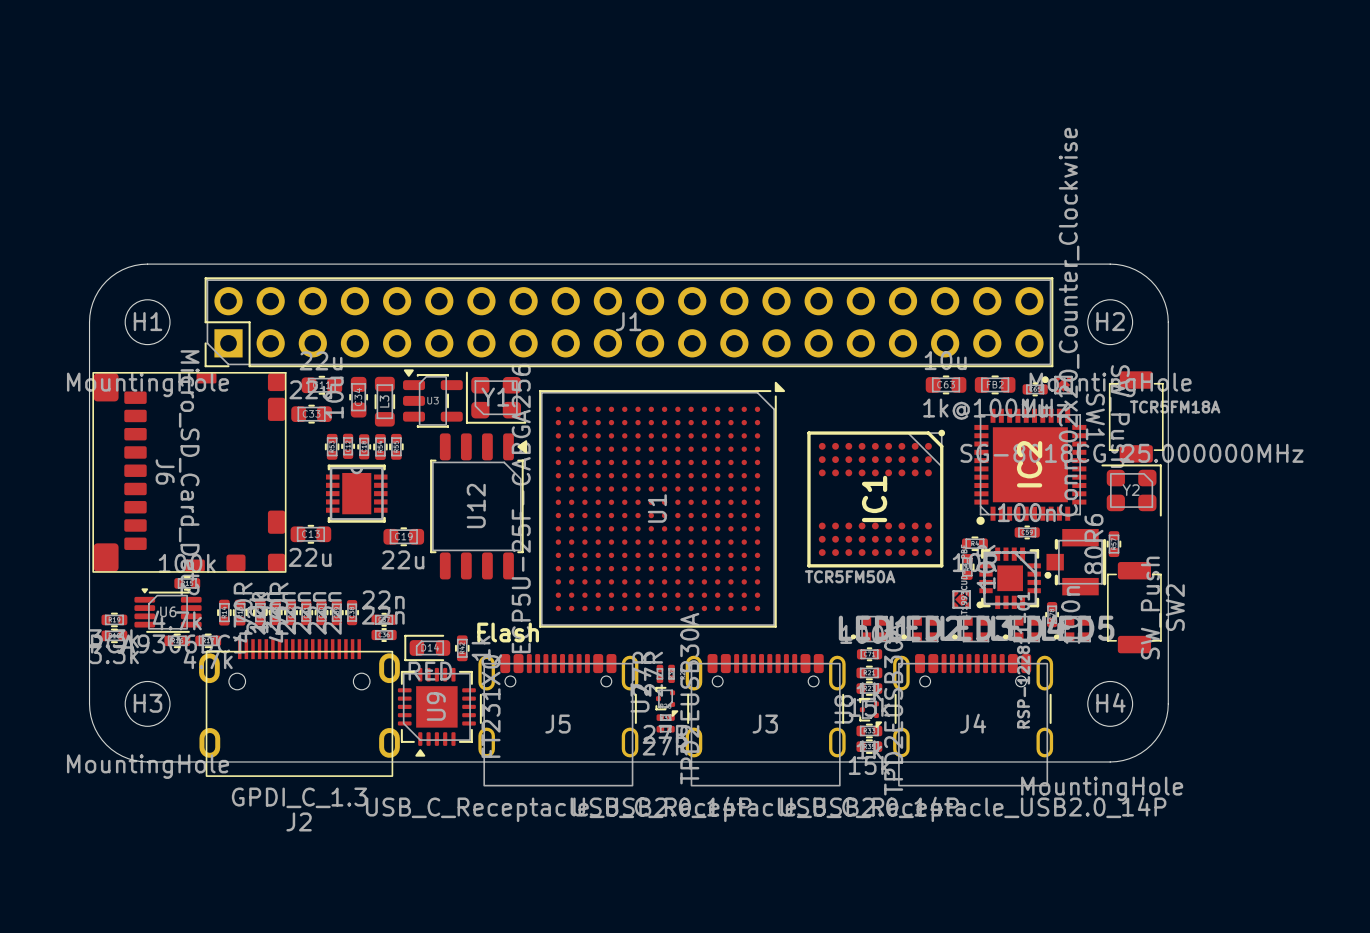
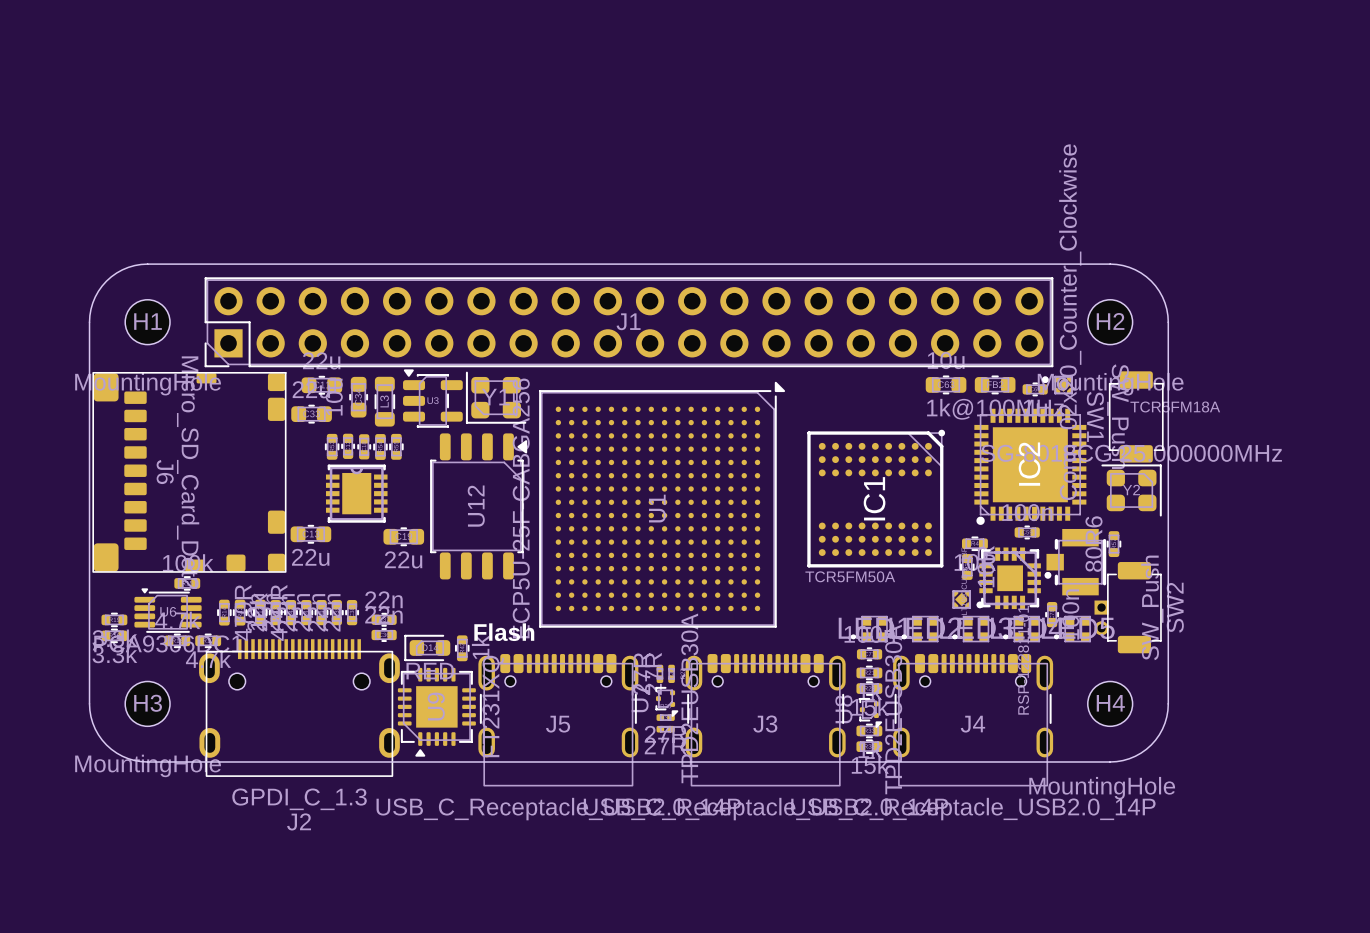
part: none -> (1101, 617)

